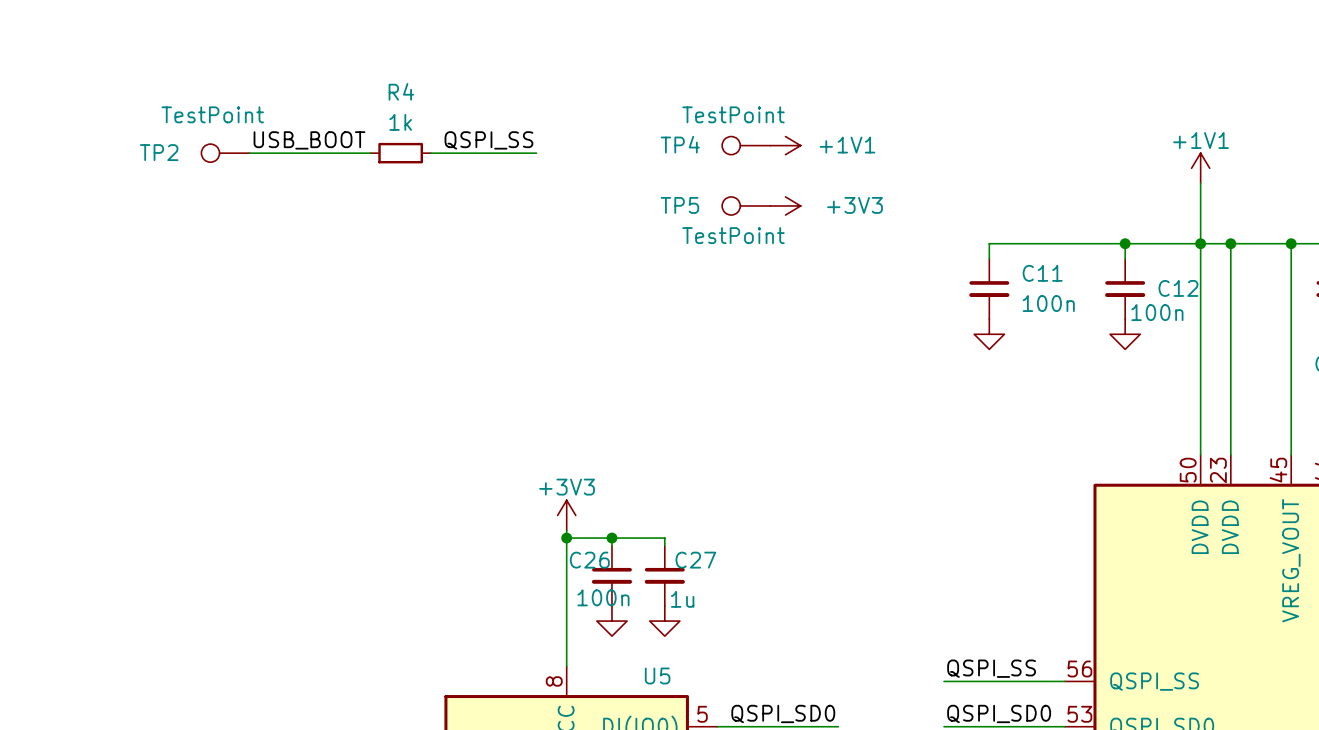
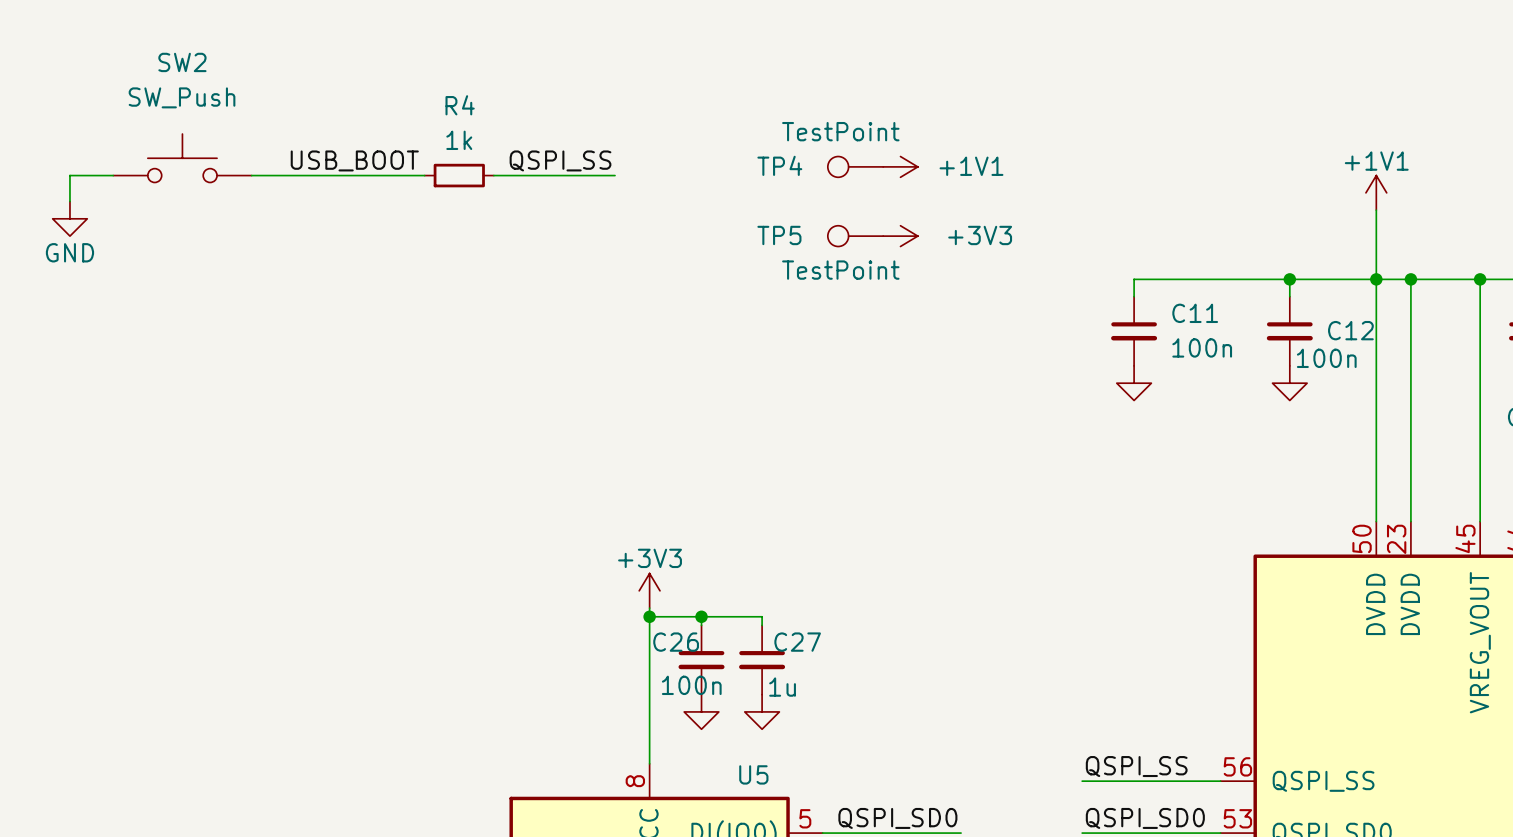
SW2: none -> SW_Push (182, 158)
wire: none -> (113, 175) (69, 175) (69, 201)
TP2: TestPoint (225, 153) -> none
power symbol: none -> GND (69, 218)

